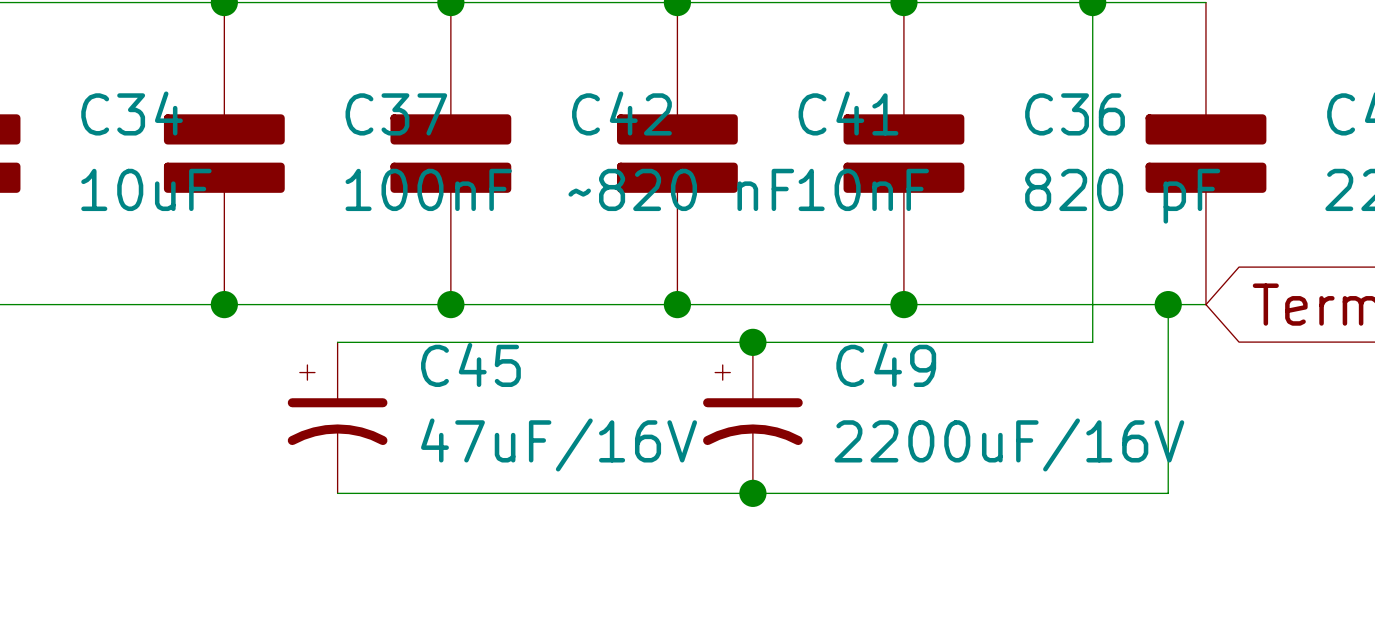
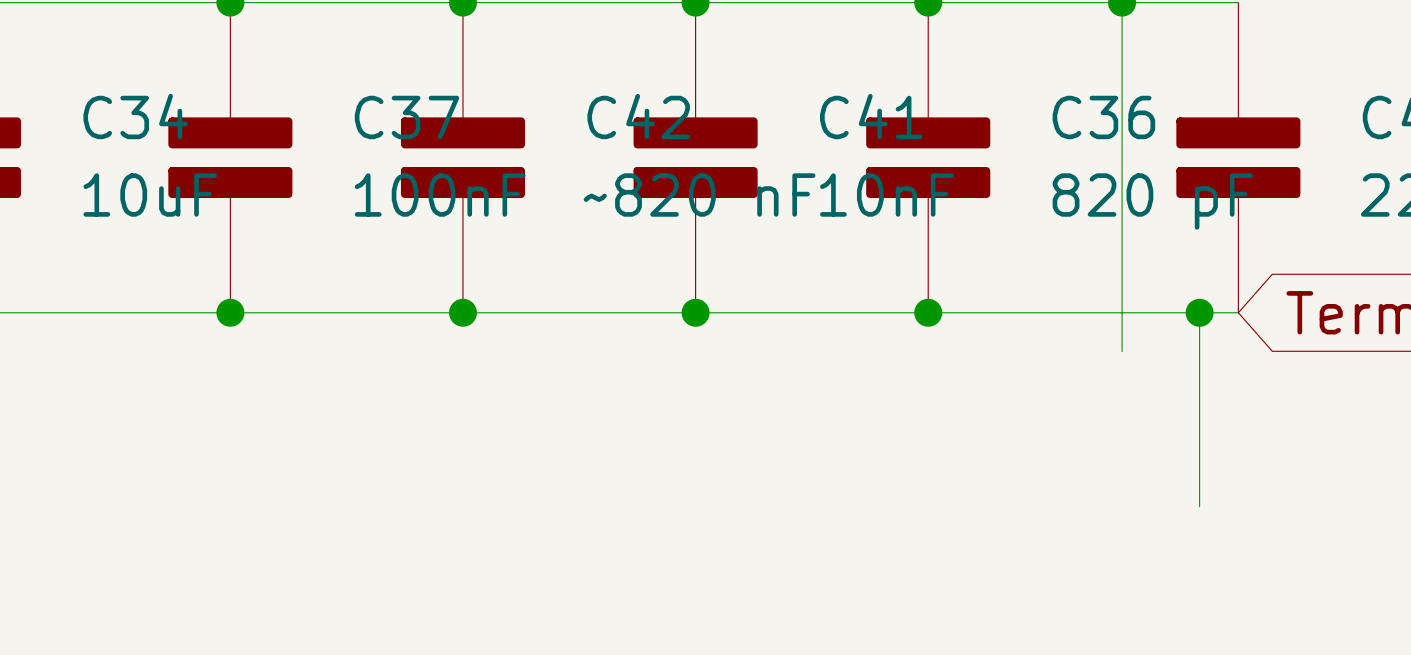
wire: (337, 342) (1092, 342) -> none
junction: (752, 342) -> none
C45: (337, 417) -> none
C49: (752, 417) -> none
wire: (337, 493) (1168, 493) -> none
junction: (752, 493) -> none

